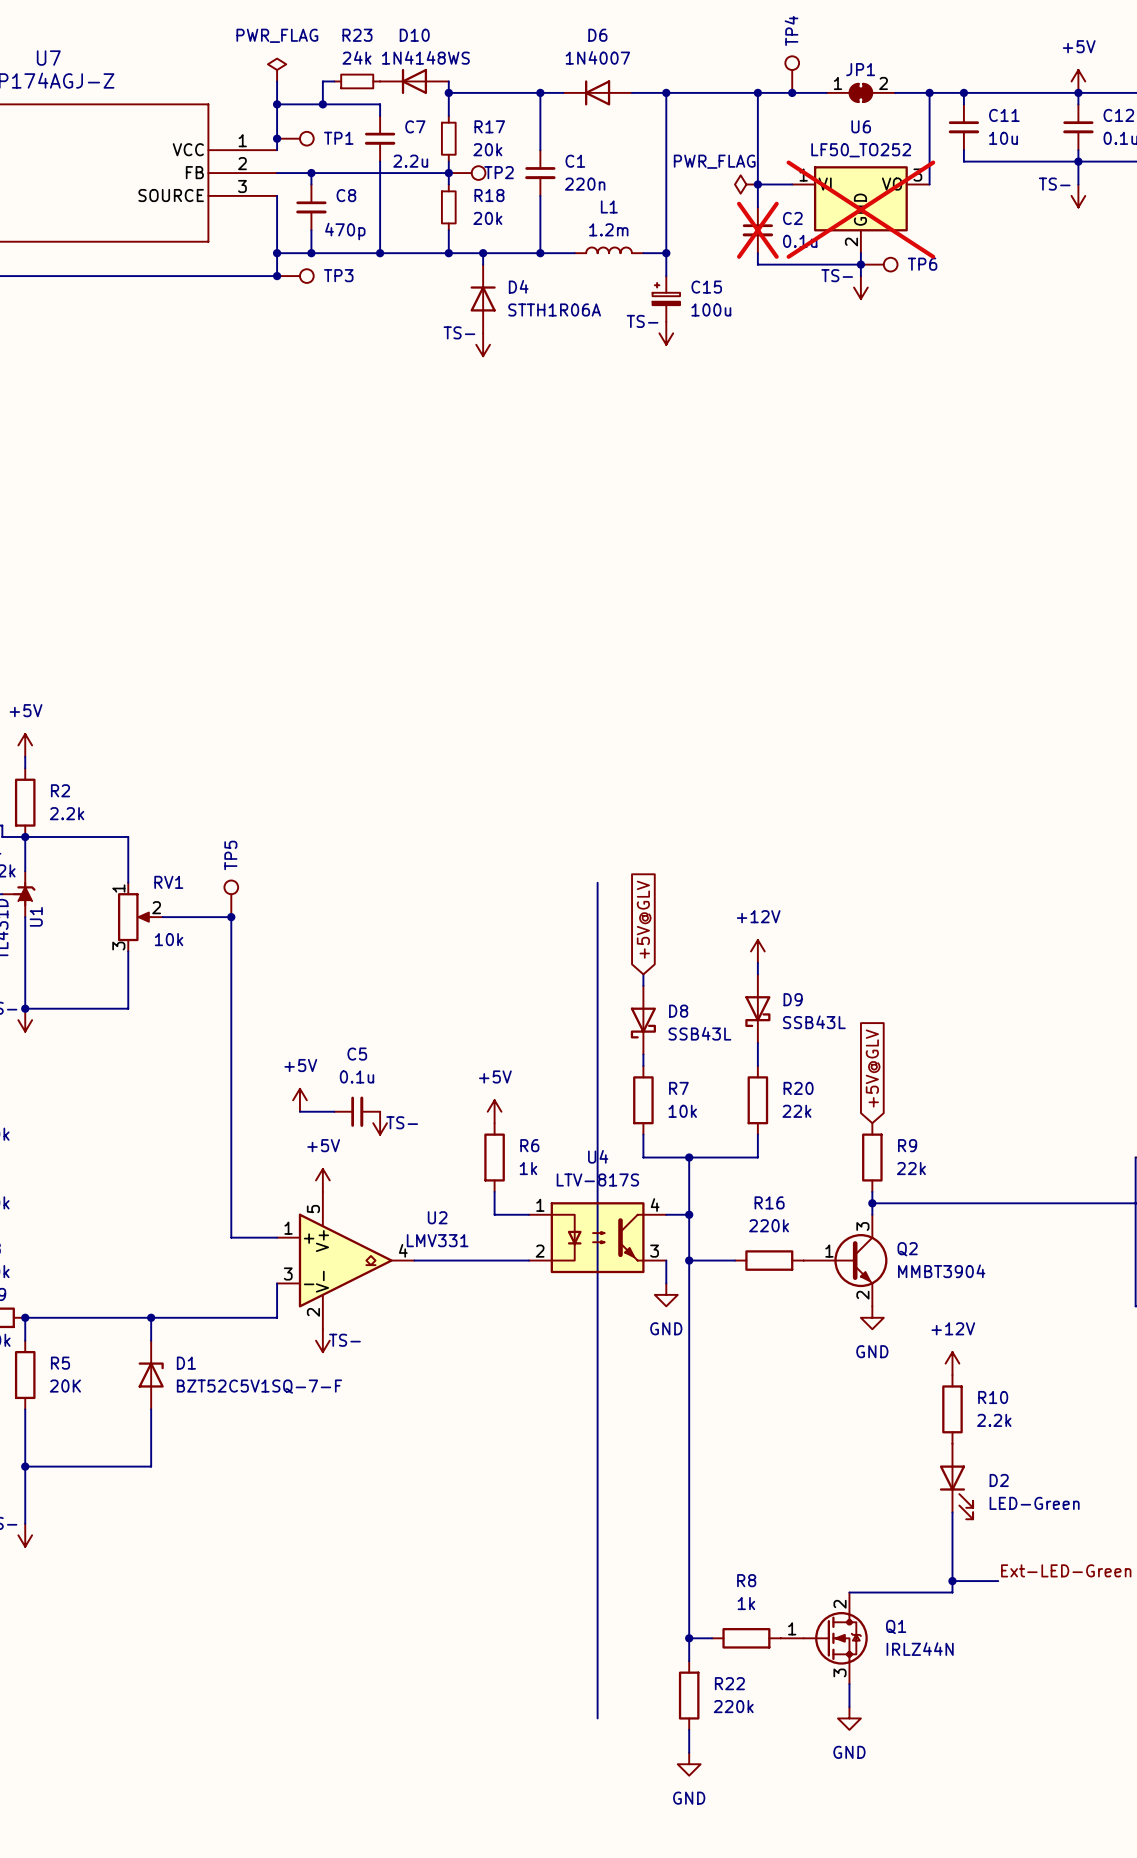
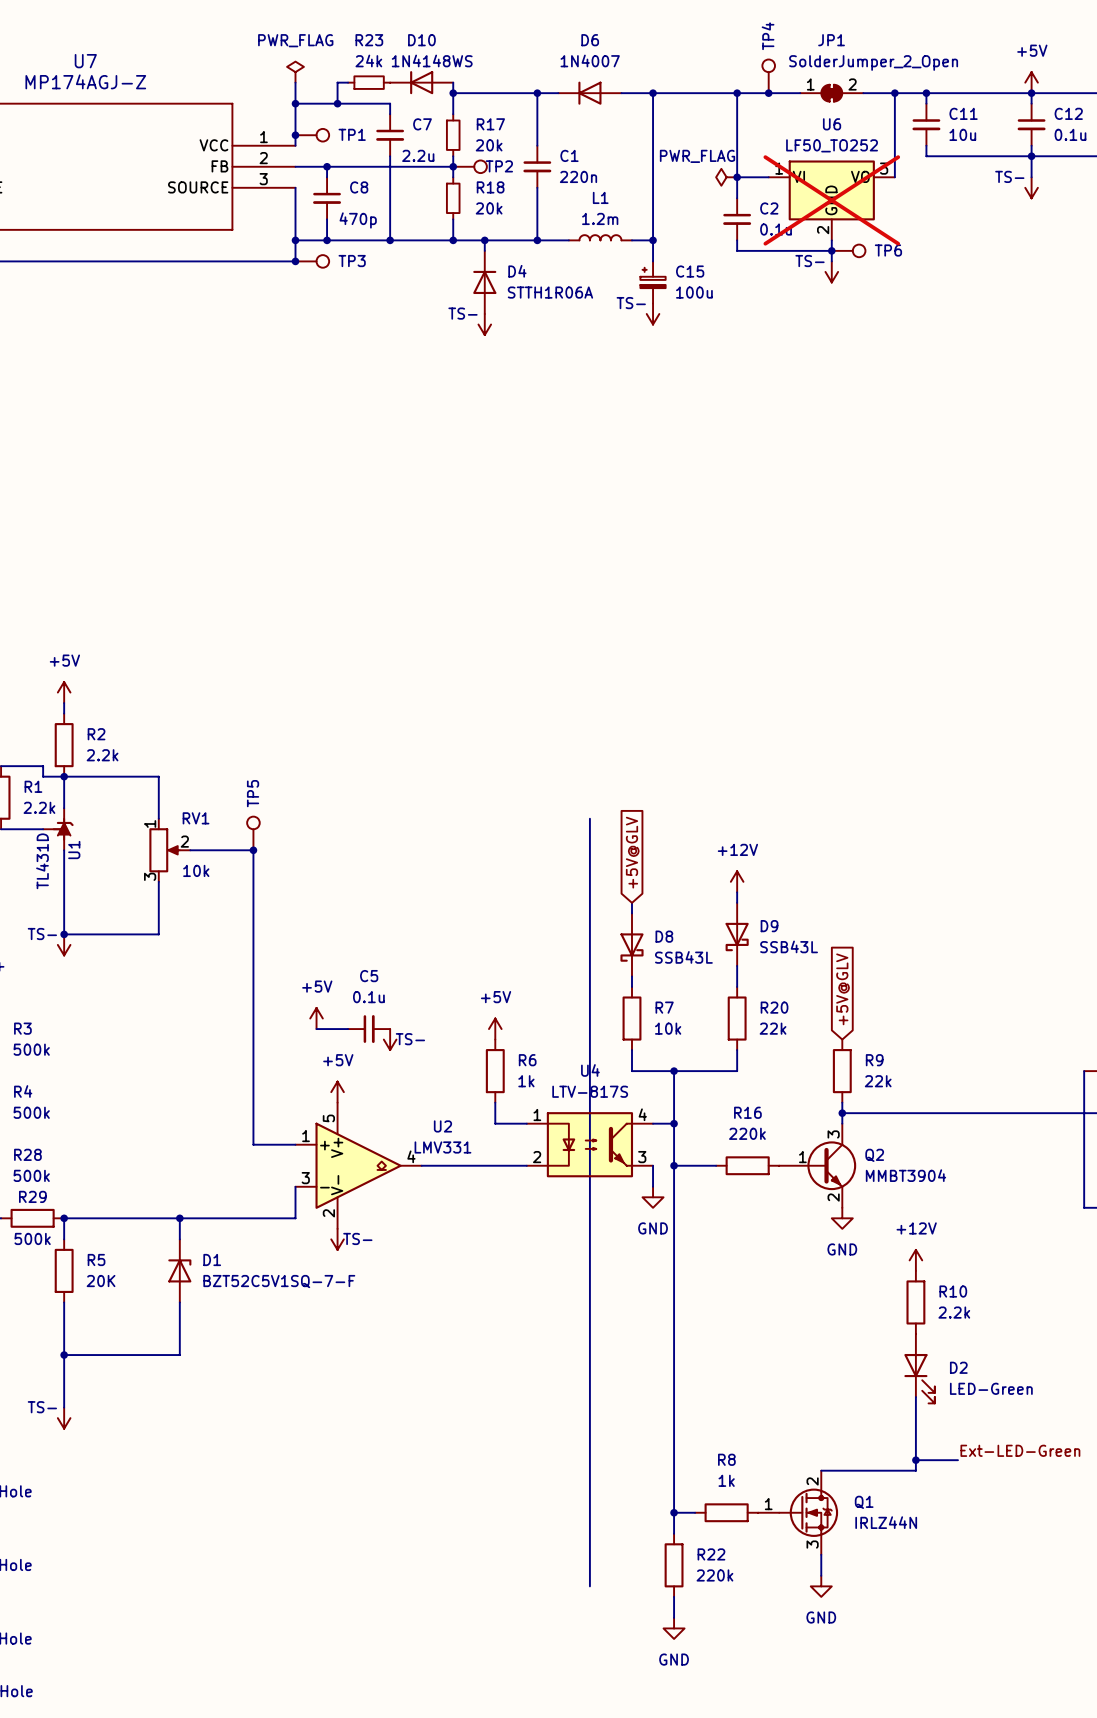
JP1 value: none -> SolderJumper_2_Open (873, 62)
JP1 name position: JP1 (860, 69) -> JP1 (831, 40)
C2 do-not-place cross: (757, 230) -> none

